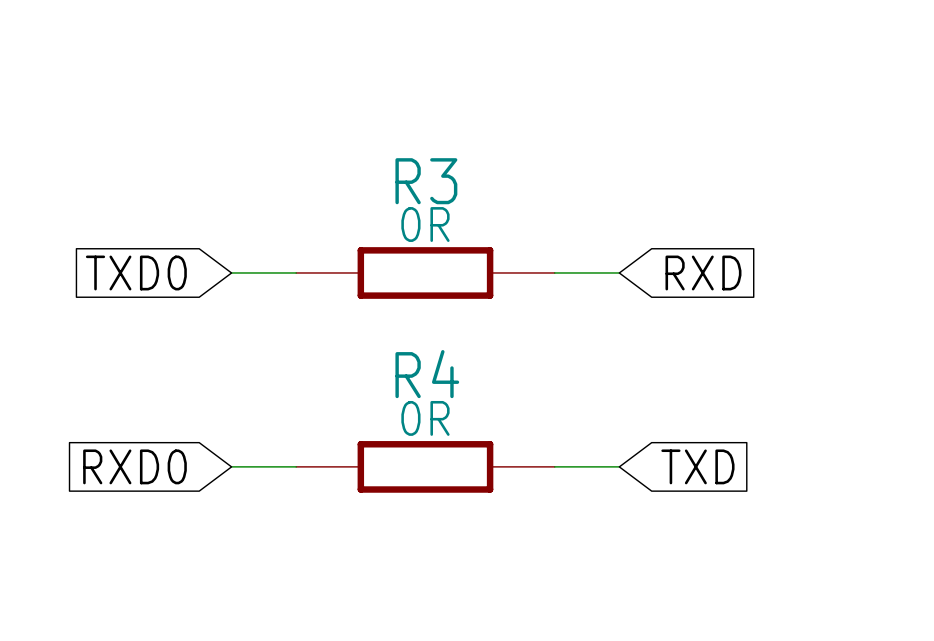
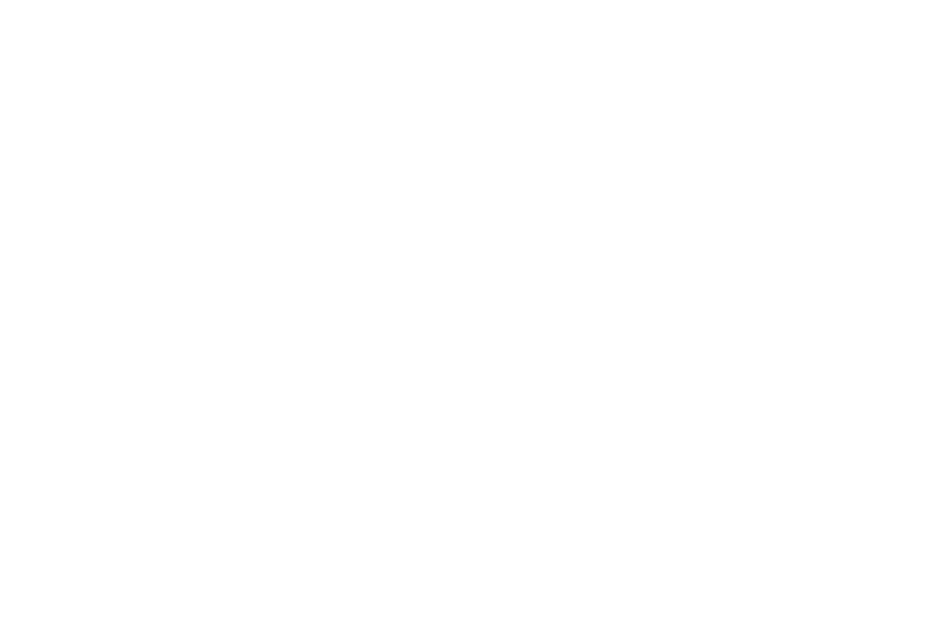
global label: TXD0 (136, 272) -> none
wire: (231, 272) (296, 272) -> none
R3: 0R (425, 272) -> none
wire: (554, 272) (619, 272) -> none
global label: RXD (703, 272) -> none
global label: RXD0 (134, 466) -> none
wire: (231, 466) (296, 466) -> none
R4: 0R (425, 466) -> none
wire: (554, 466) (619, 466) -> none
global label: TXD (697, 466) -> none

